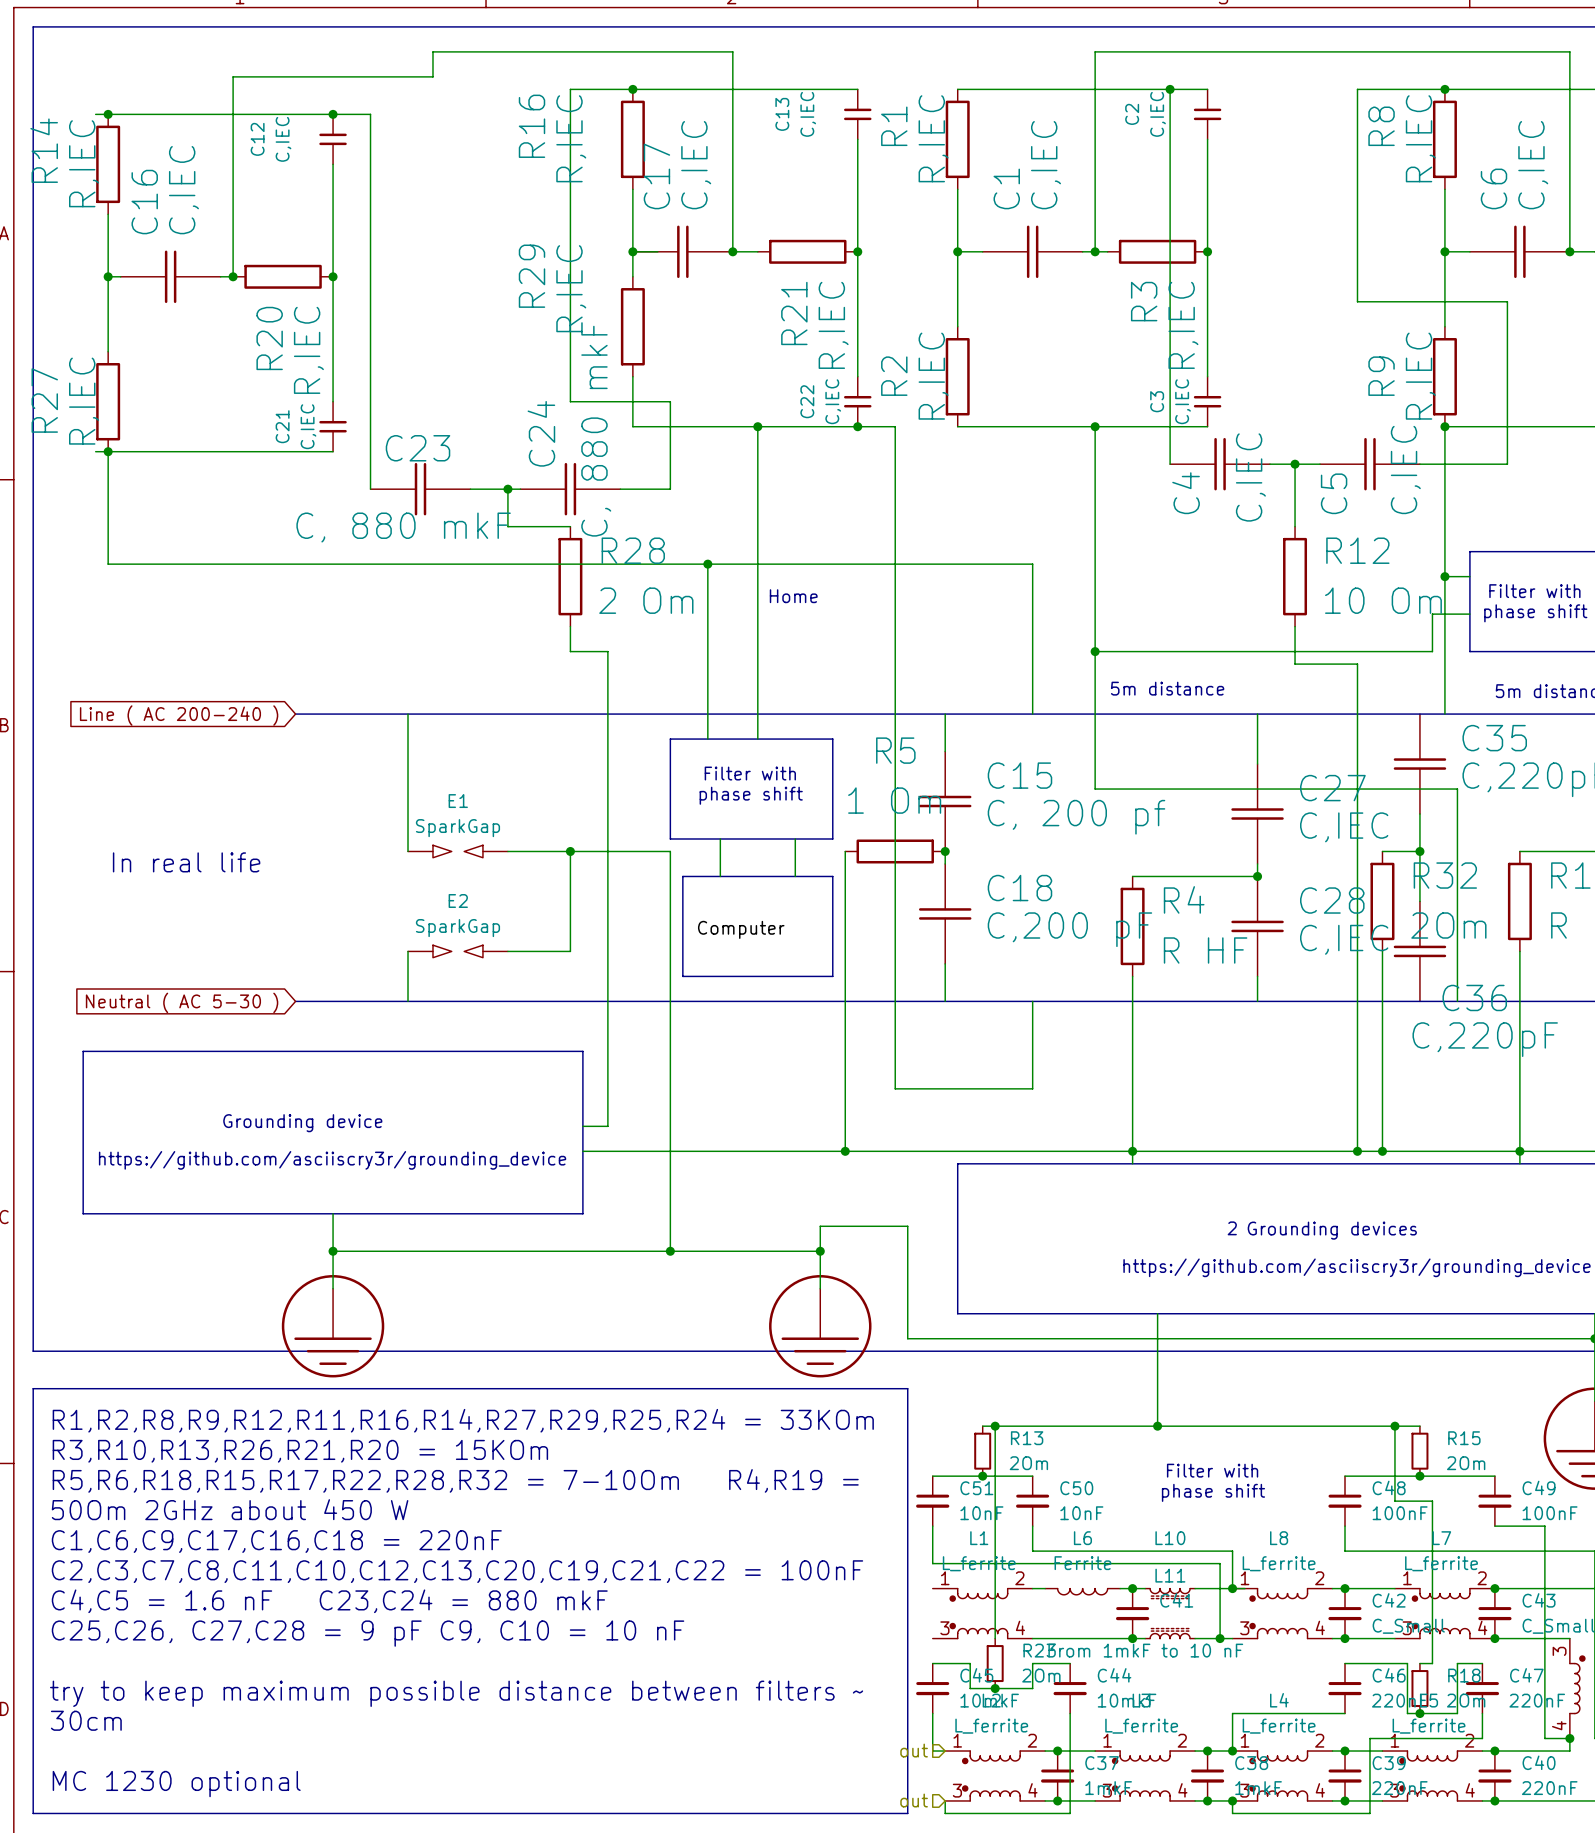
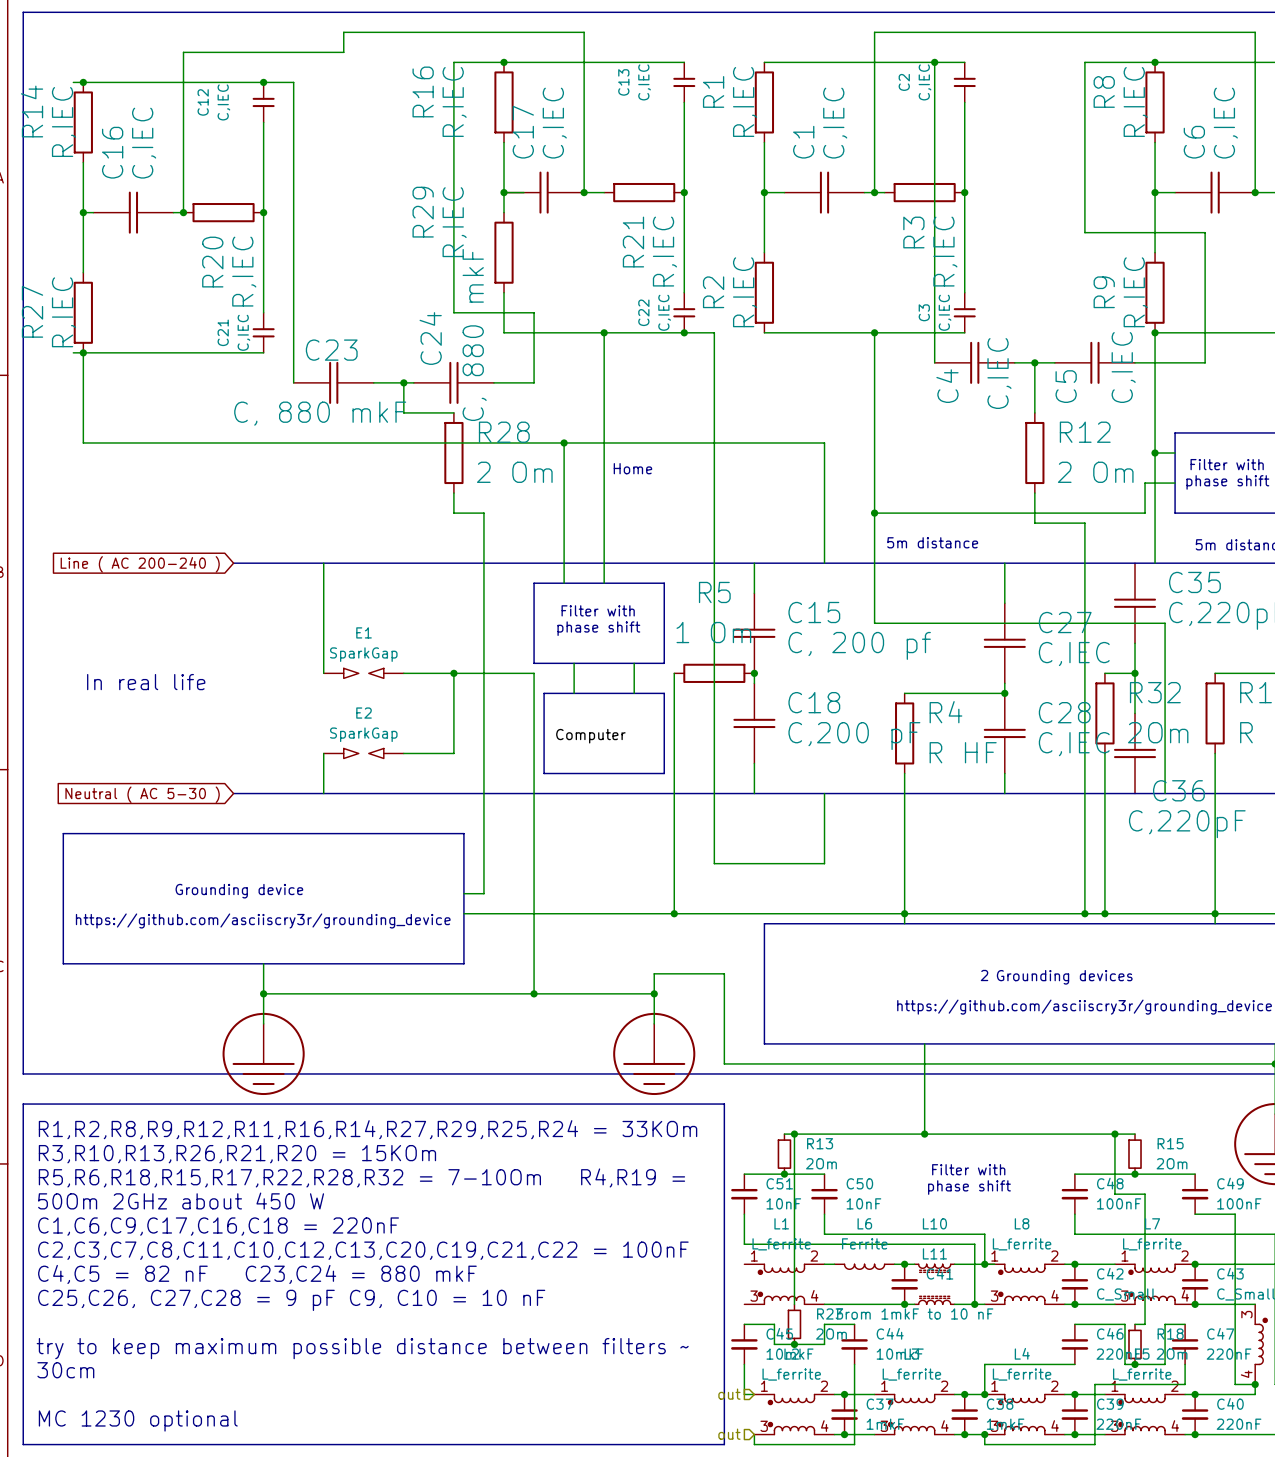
R12 value: 10 Om (1383, 600) -> 2 Om (1095, 472)
text: C4,C5 = 1.6 nF C23,C24 = 880 mkF (329, 1601) -> C4,C5 = 82 nF C23,C24 = 880 mkF (257, 1274)

